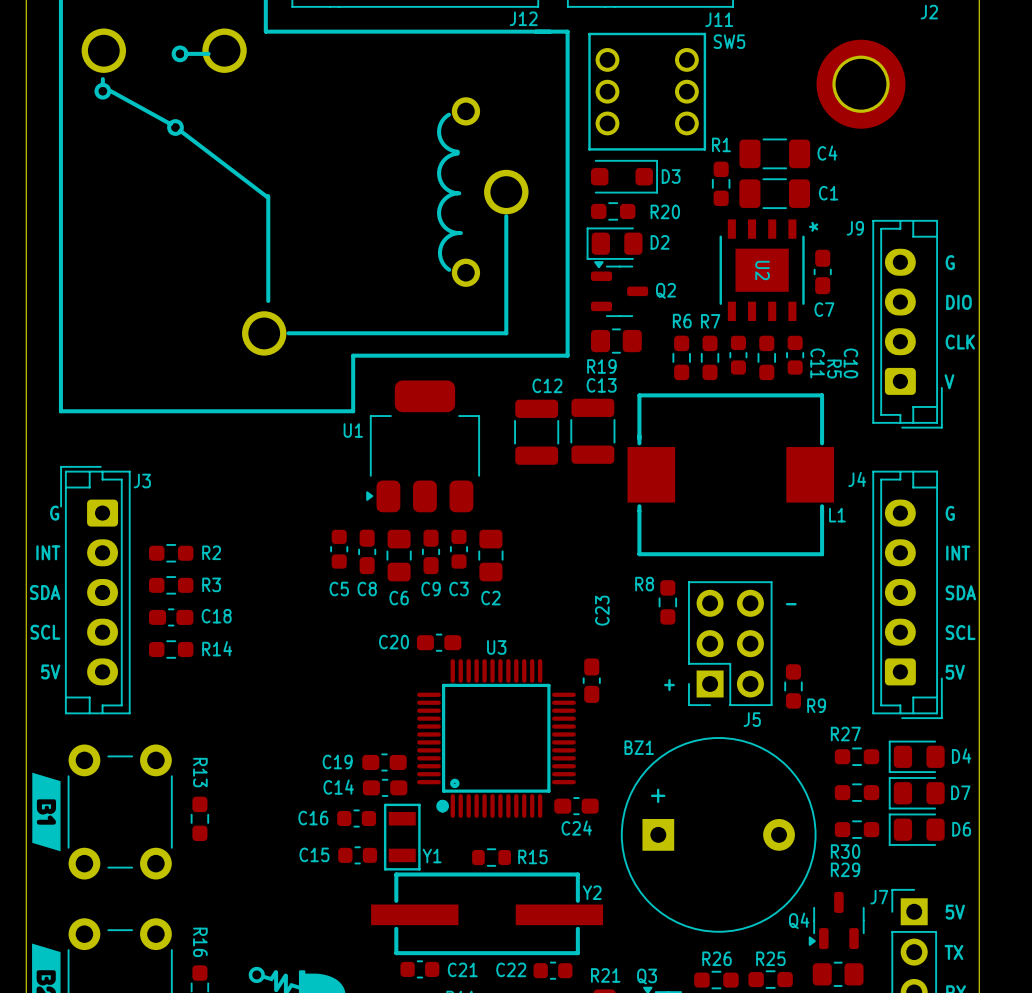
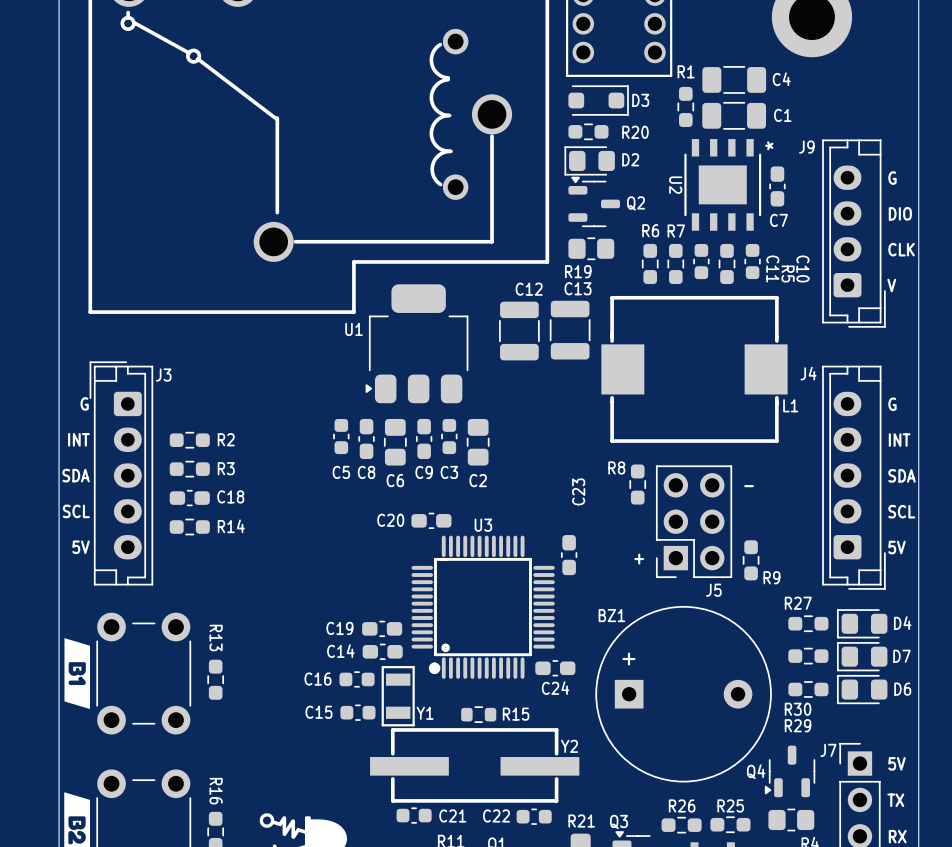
U2 name position: U2 (762, 270) -> U2 (675, 185)

